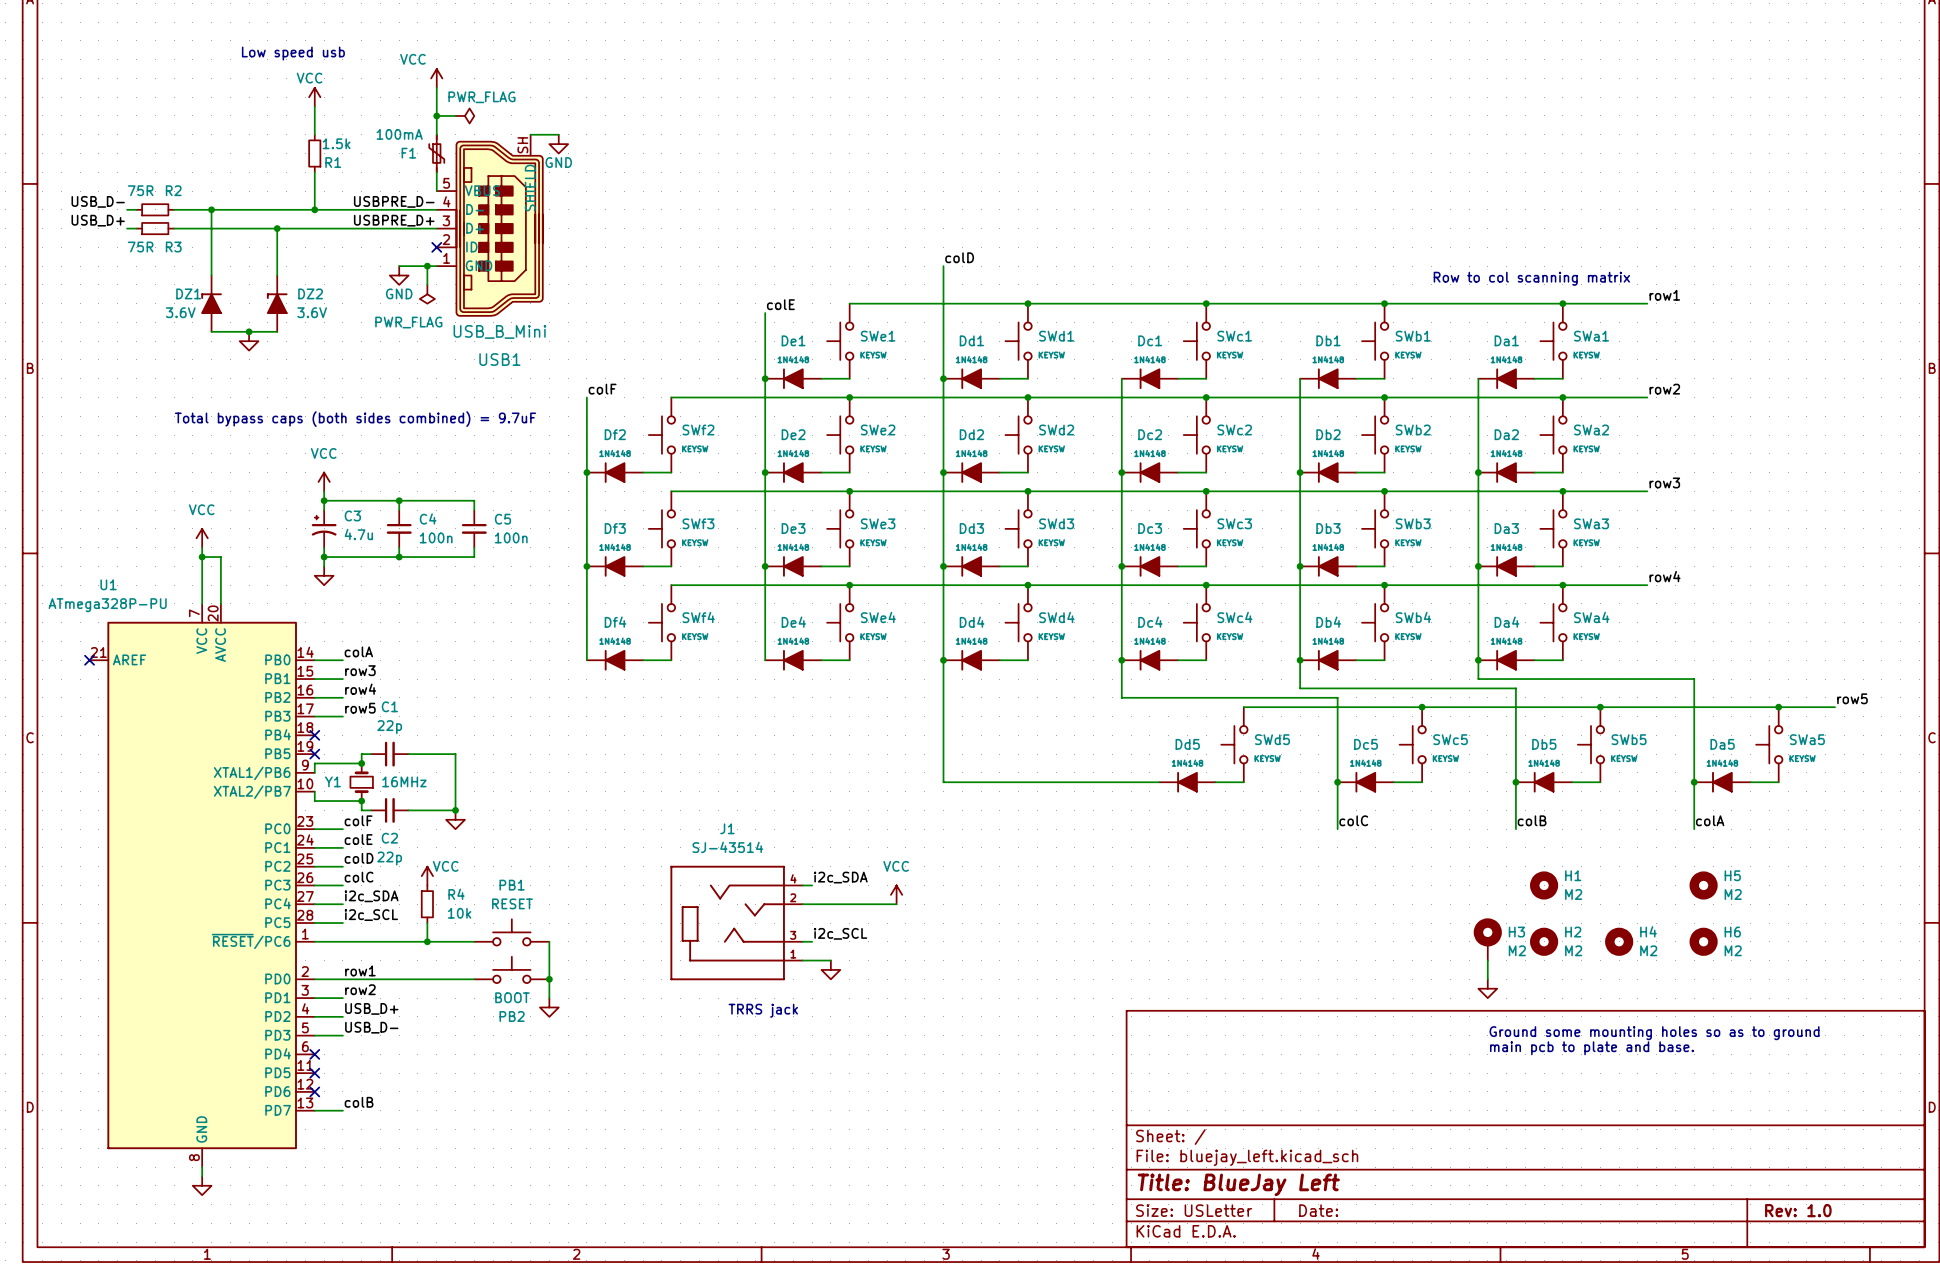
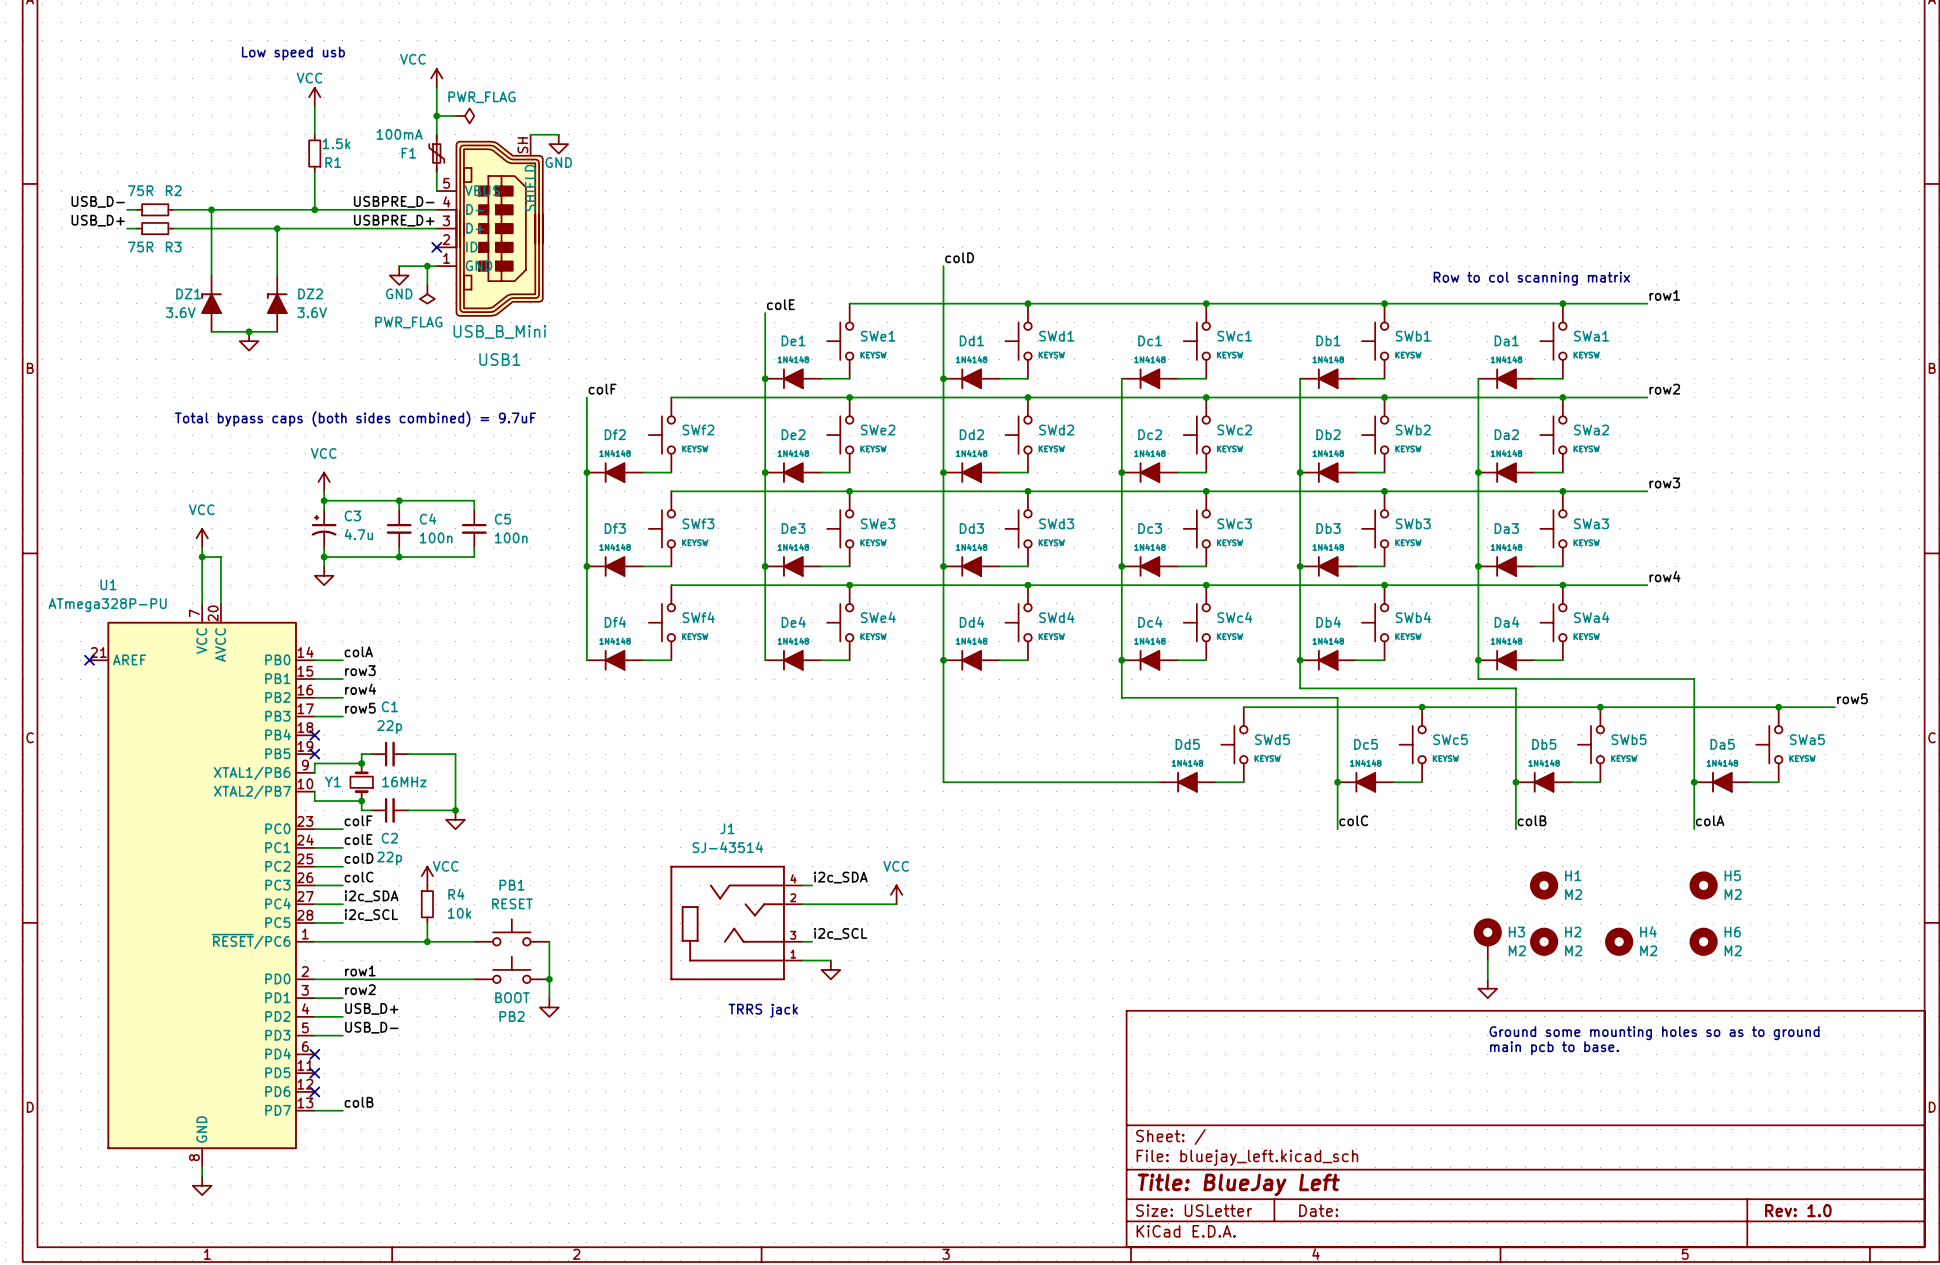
text: main pcb to plate and base. (1591, 1048) -> main pcb to base. (1554, 1048)

